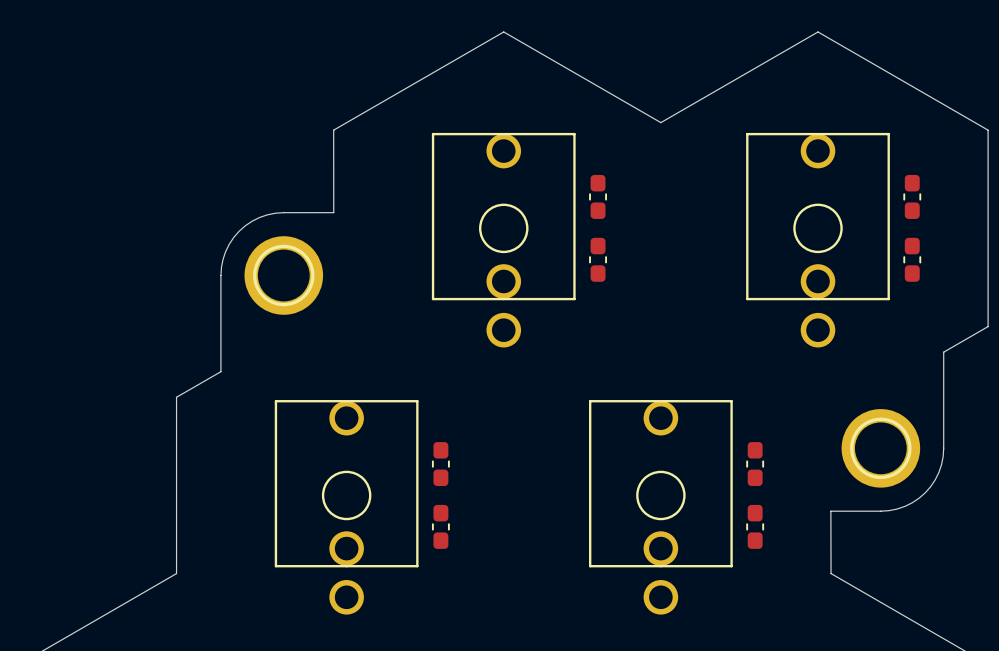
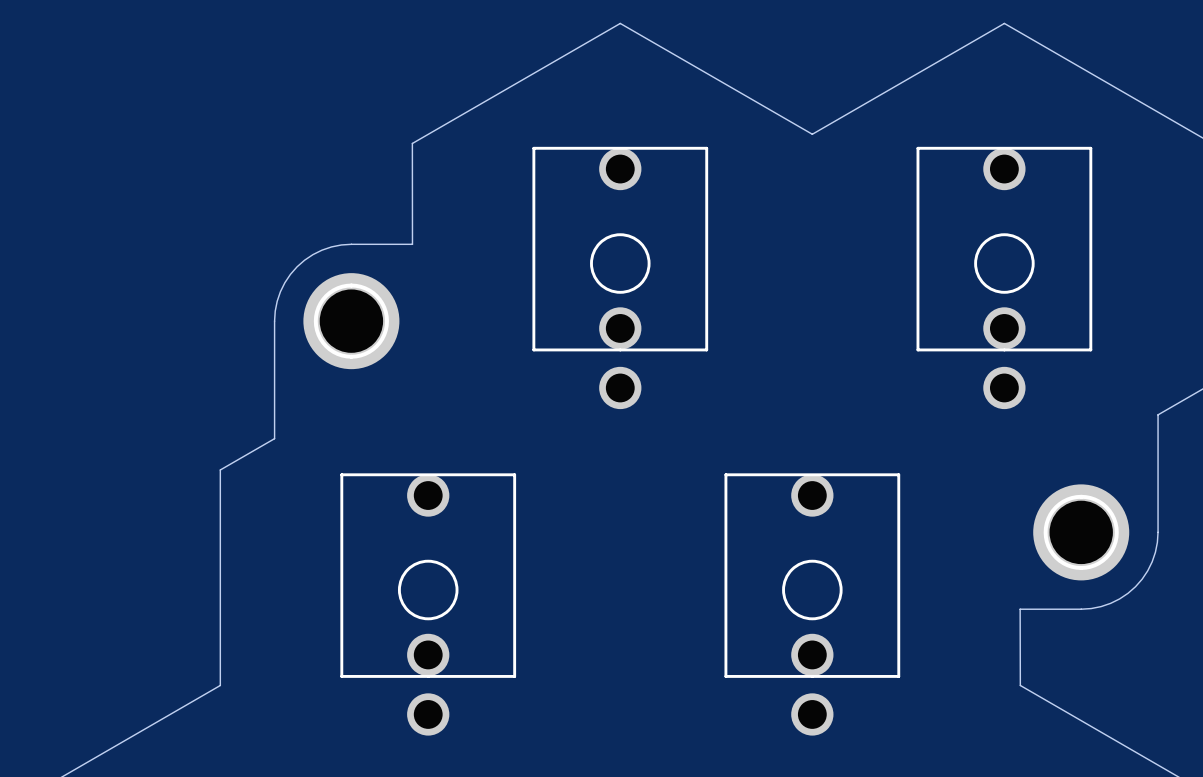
part: (598, 196) -> none
part: (912, 196) -> none
part: (598, 259) -> none
part: (912, 259) -> none
part: (440, 464) -> none
part: (755, 464) -> none
part: (440, 526) -> none
part: (755, 526) -> none

